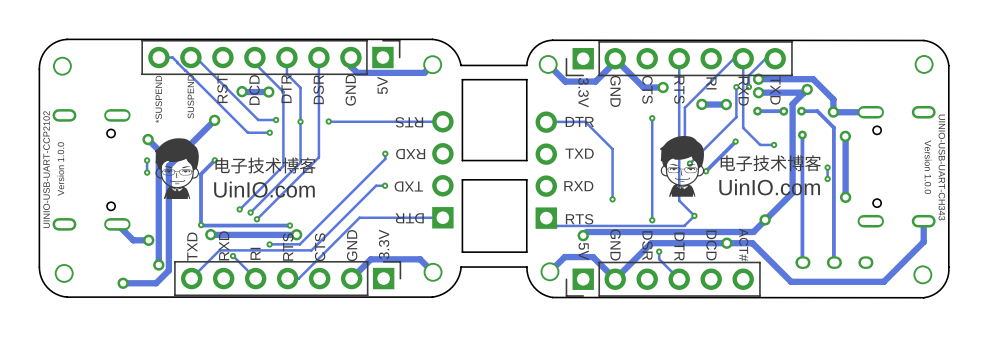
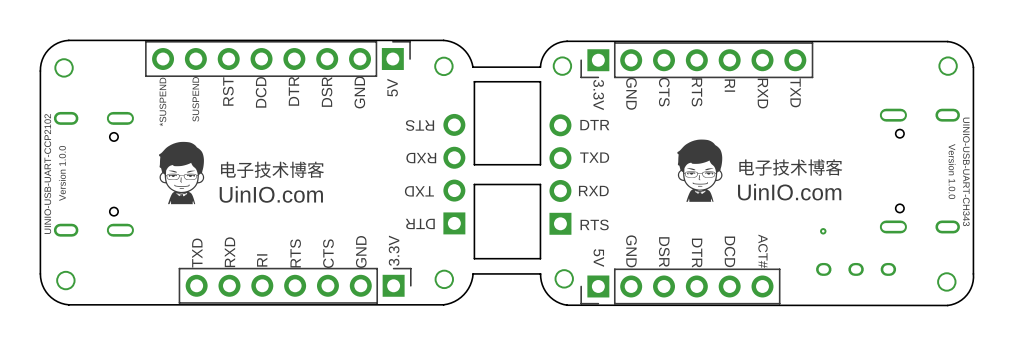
track: (158, 57) (172, 57) (247, 132) (269, 132) -> none
track: (195, 57) (258, 120) (276, 120) -> none
track: (286, 57) (286, 74) (300, 87) (300, 162) (250, 212) -> none
track: (318, 57) (318, 157) (257, 219) -> none
track: (350, 57) (350, 66) (357, 72) (424, 72) (432, 64) -> none
track: (615, 58) (615, 61) (595, 81) (565, 81) (548, 64) -> none
track: (679, 58) (679, 200) (694, 215) (684, 225) (555, 227) -> none
track: (775, 58) (765, 58) (748, 75) (748, 86) -> none
track: (615, 59) (643, 87) (663, 87) -> none
track: (254, 63) (283, 91) (283, 165) (239, 209) -> none
track: (758, 79) (813, 79) (833, 99) (833, 112) (870, 112) -> none
via: (758, 79) -> none
via: (748, 86) -> none
via: (663, 87) -> none
track: (736, 87) (736, 117) (690, 163) -> none
via: (736, 87) -> none
track: (807, 89) (792, 104) (792, 192) (753, 231) (586, 231) (583, 235) -> none
via: (807, 89) -> none
track: (242, 91) (268, 92) -> none
via: (242, 91) -> none
via: (268, 92) -> none
via: (758, 92) -> none
track: (804, 92) (758, 92) -> none
via: (701, 104) -> none
track: (726, 104) (702, 104) -> none
via: (726, 104) -> none
via: (757, 111) -> none
track: (783, 111) (757, 111) -> none
via: (783, 111) -> none
track: (801, 111) (817, 111) (833, 127) (833, 263) -> none
via: (801, 111) -> none
via: (833, 112) -> none
track: (652, 118) (652, 220) -> none
via: (652, 118) -> none
track: (214, 120) (168, 166) (168, 270) (156, 283) (123, 283) -> none
via: (214, 120) -> none
via: (276, 120) -> none
via: (300, 121) -> none
track: (328, 121) (442, 121) -> none
via: (328, 121) -> none
track: (546, 121) (585, 121) (612, 149) (612, 199) -> none
via: (269, 132) -> none
track: (802, 134) (802, 263) -> none
via: (802, 134) -> none
track: (845, 136) (845, 197) -> none
via: (845, 136) -> none
track: (148, 139) (158, 150) (158, 265) -> none
via: (148, 139) -> none
track: (735, 141) (706, 171) -> none
via: (735, 141) -> none
track: (774, 144) (760, 144) (743, 127) (743, 58) (733, 58) (684, 107) (684, 153) -> none
via: (774, 144) -> none
track: (385, 153) (385, 158) (299, 244) (269, 244) -> none
via: (385, 153) -> none
track: (147, 160) (147, 172) -> none
via: (147, 160) -> none
track: (214, 160) (201, 174) (201, 225) (289, 225) -> none
via: (214, 160) -> none
via: (689, 163) -> none
track: (827, 167) (827, 178) -> none
via: (827, 167) -> none
via: (706, 171) -> none
via: (147, 172) -> none
via: (827, 178) -> none
track: (385, 185) (376, 185) (311, 250) (219, 250) (191, 278) -> none
via: (385, 185) -> none
via: (845, 197) -> none
via: (612, 199) -> none
via: (239, 209) -> none
via: (250, 212) -> none
via: (694, 215) -> none
track: (442, 217) (359, 217) (298, 278) (287, 278) -> none
via: (256, 219) -> none
via: (765, 219) -> none
via: (652, 220) -> none
track: (923, 221) (923, 241) (883, 281) (791, 281) (752, 243) (651, 243) (615, 279) (593, 257) (564, 257) (549, 271) -> none
track: (117, 224) (133, 240) (148, 240) -> none
via: (201, 225) -> none
via: (289, 225) -> none
via: none -> (823, 231)
track: (210, 234) (296, 234) -> none
via: (210, 234) -> none
via: (296, 234) -> none
via: (583, 235) -> none
via: (148, 240) -> none
via: (726, 243) -> none
via: (269, 244) -> none
track: (659, 251) (659, 259) (679, 279) -> none
via: (659, 251) -> none
track: (233, 256) (255, 278) -> none
via: (233, 256) -> none
via: (158, 265) -> none
track: (433, 272) (420, 259) (370, 259) (351, 278) -> none
via: (123, 283) -> none

